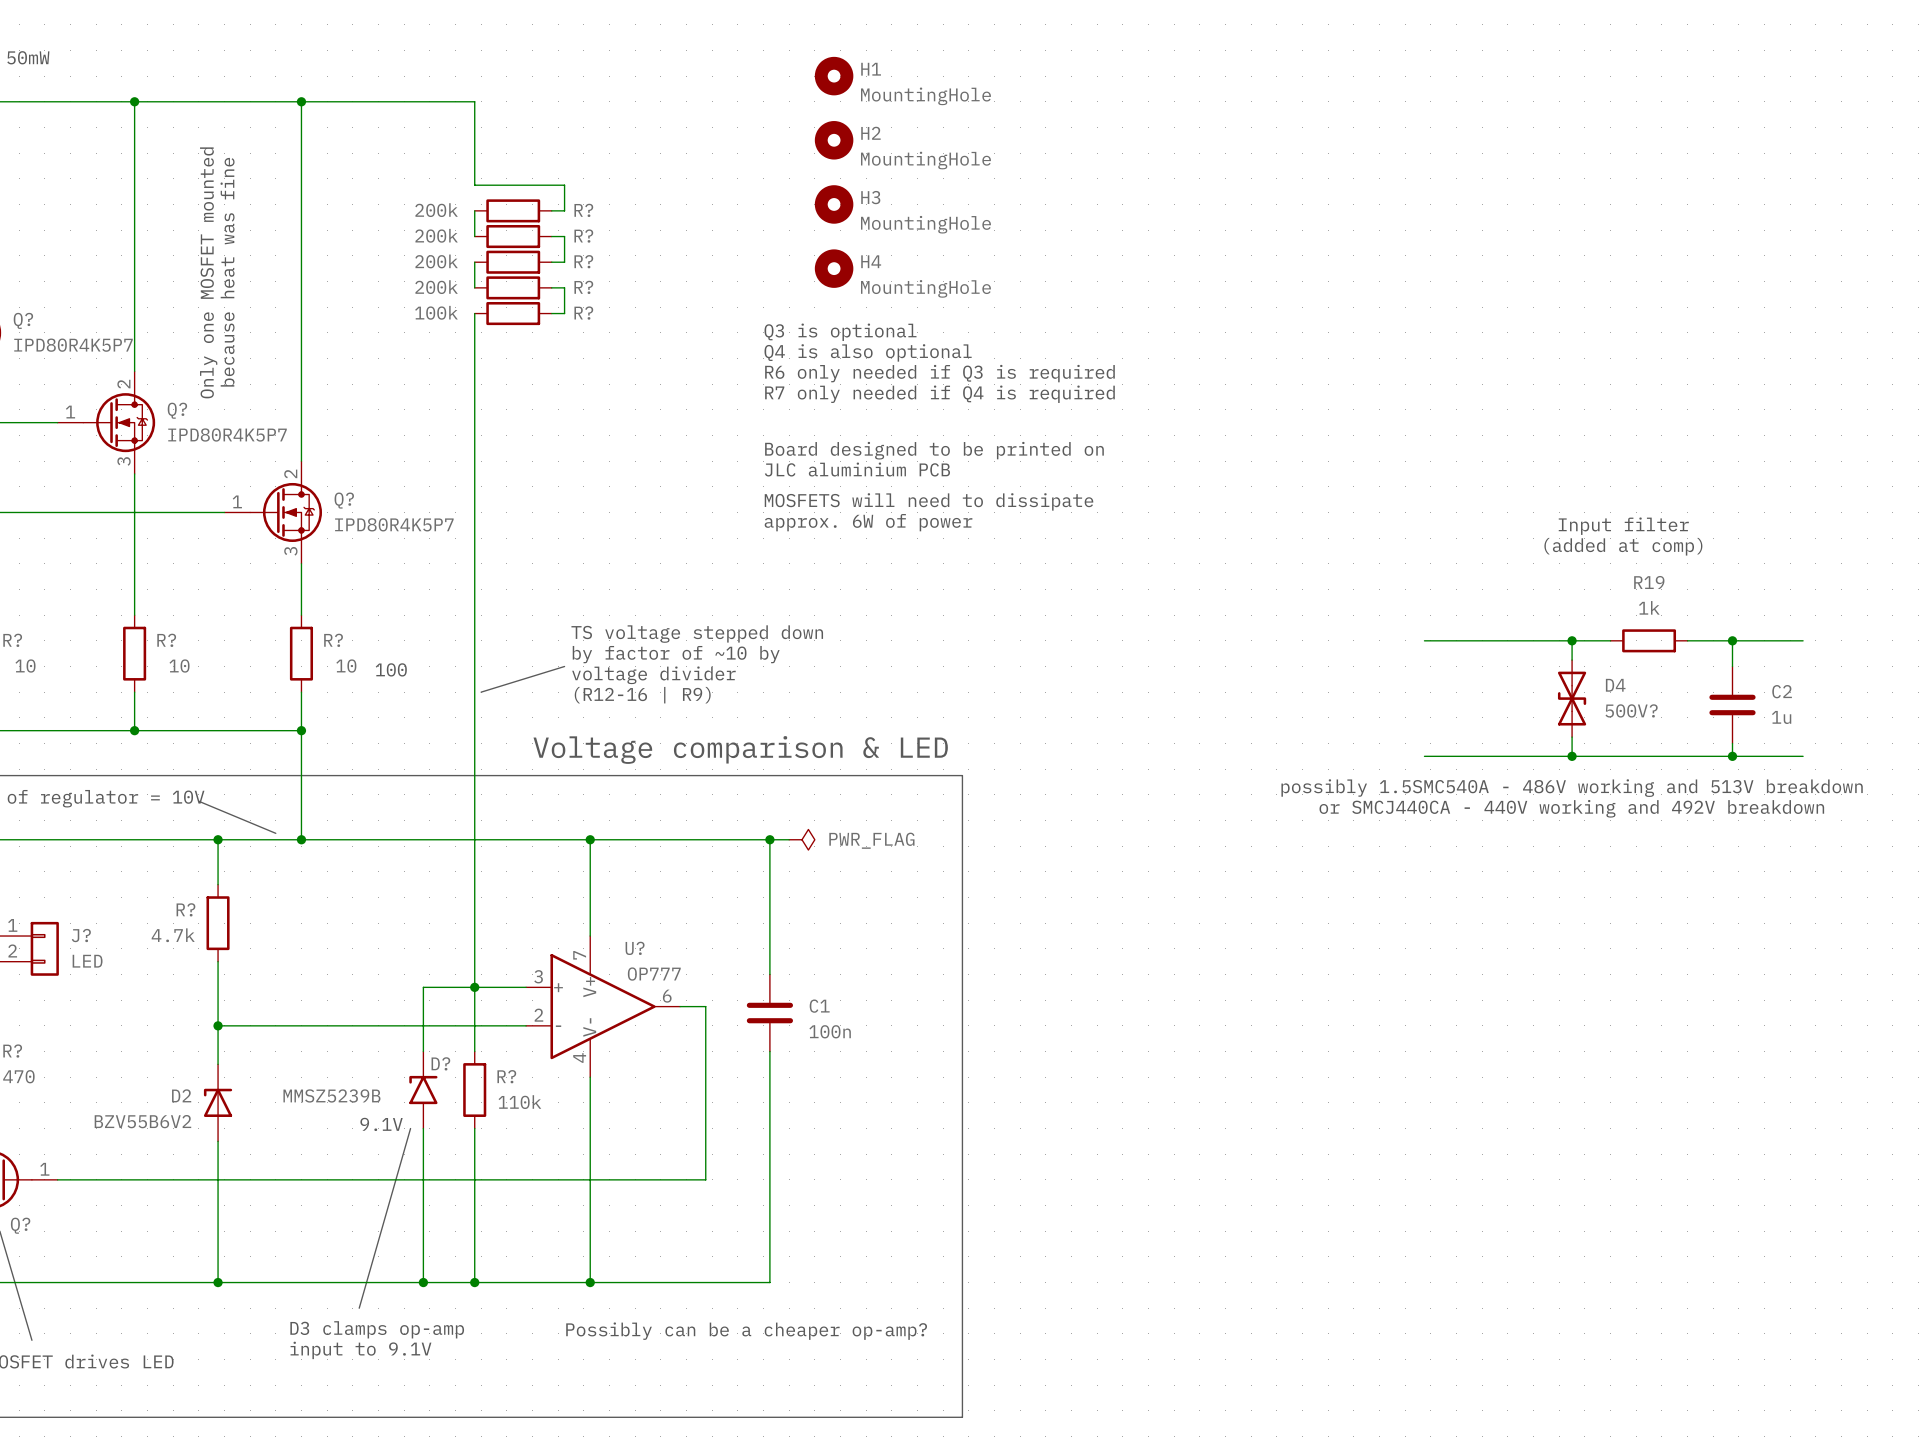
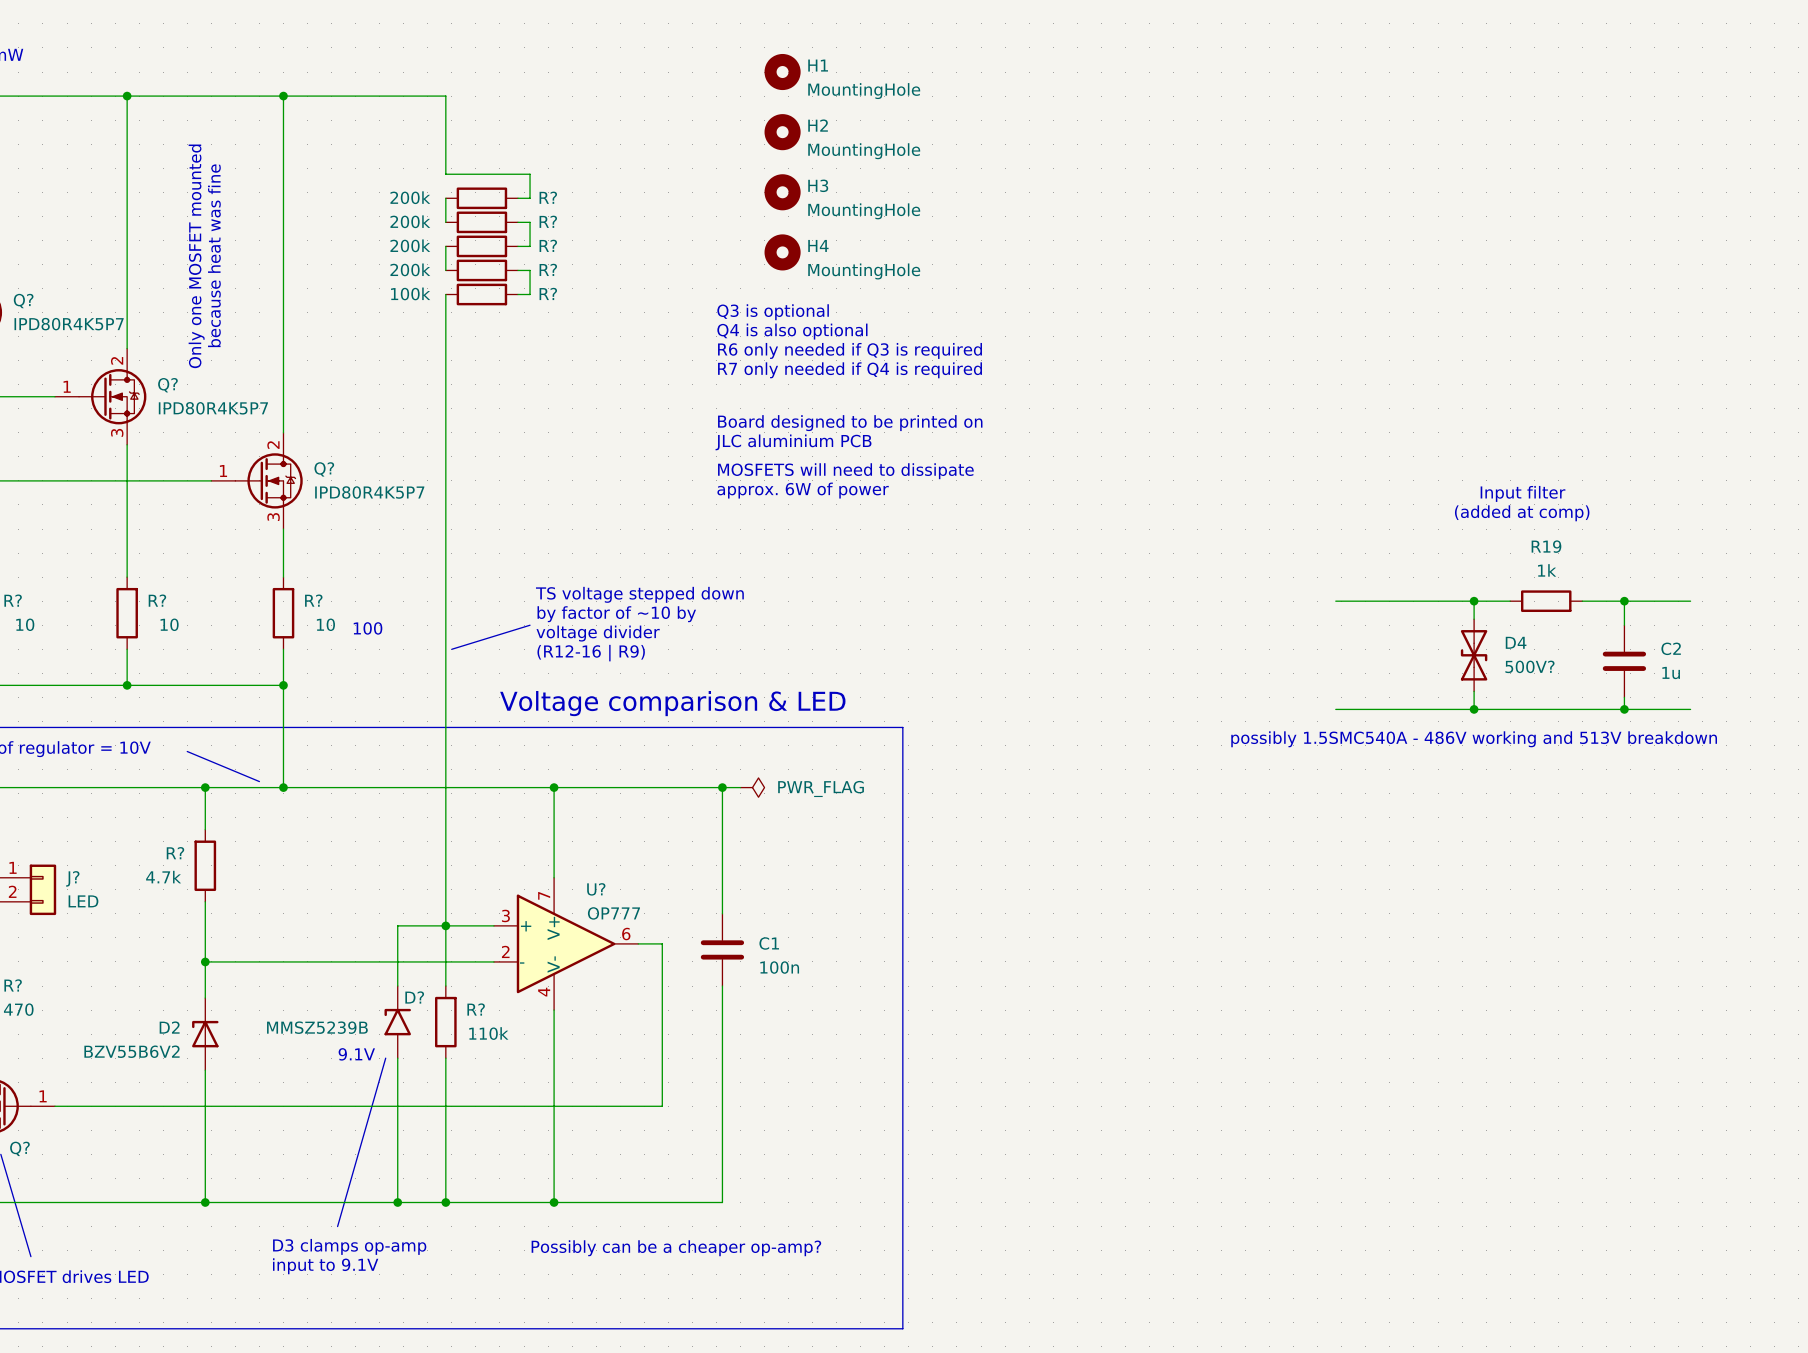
text: or SMCJ440CA - 440V working and 492V breakdown (1571, 808) -> none

